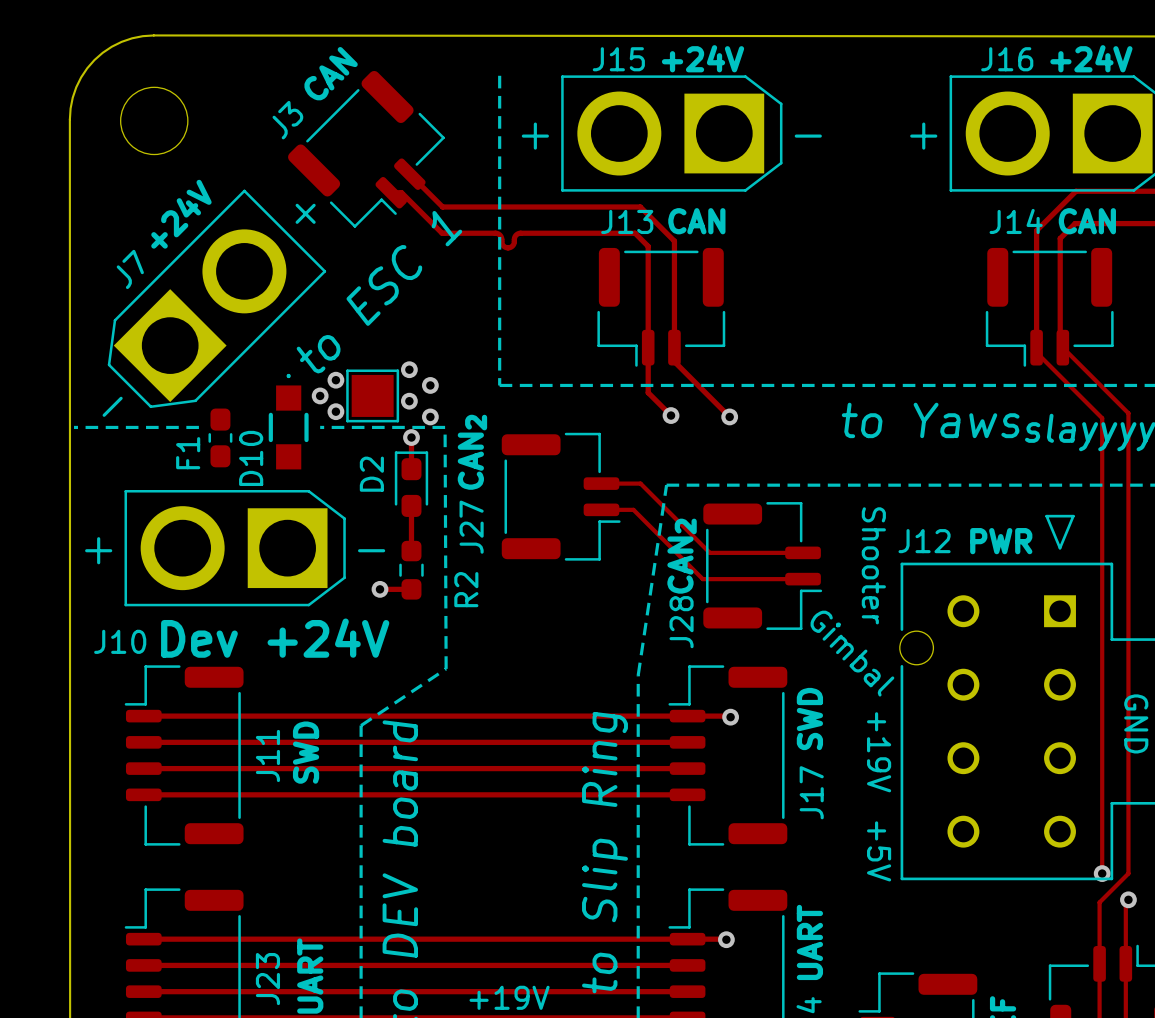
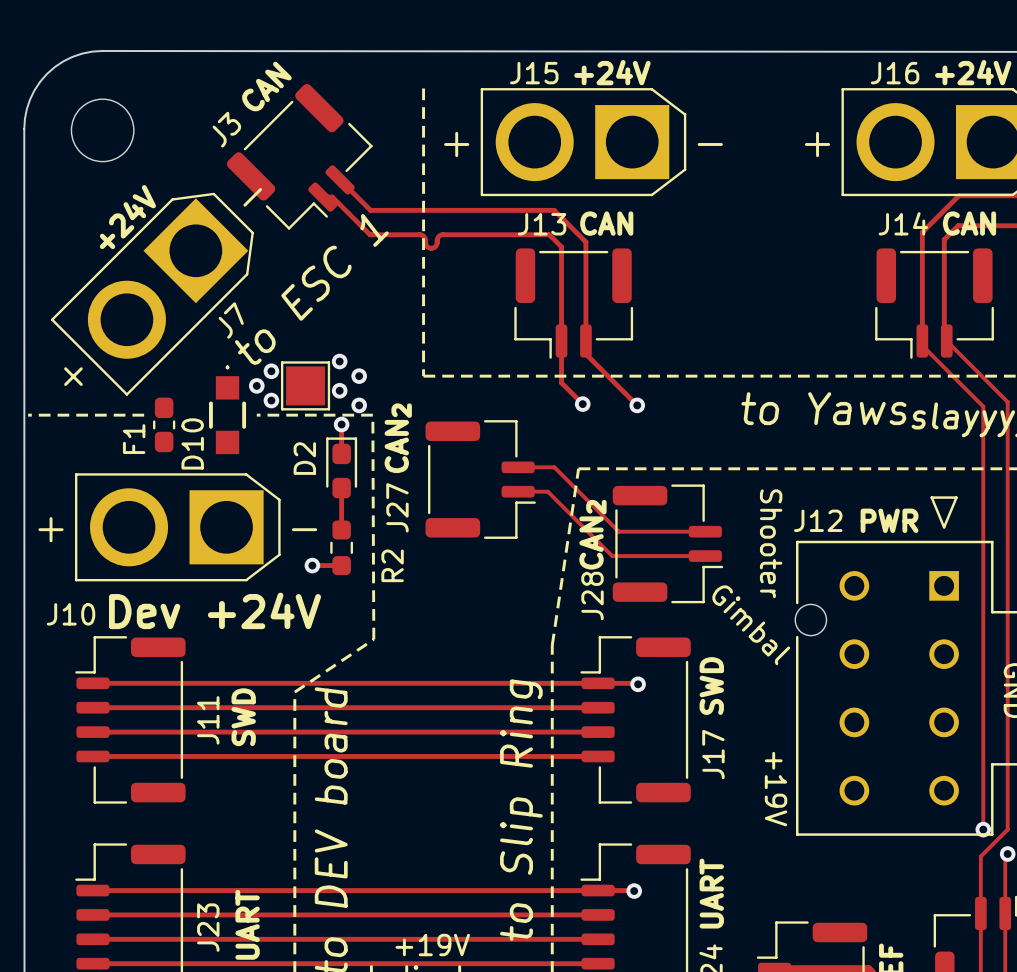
J7 rotation: 0° (216, 298) -> 180° (152, 294)
text position: +19V (879, 752) -> +19V (776, 789)
text: +5V (879, 851) -> none

